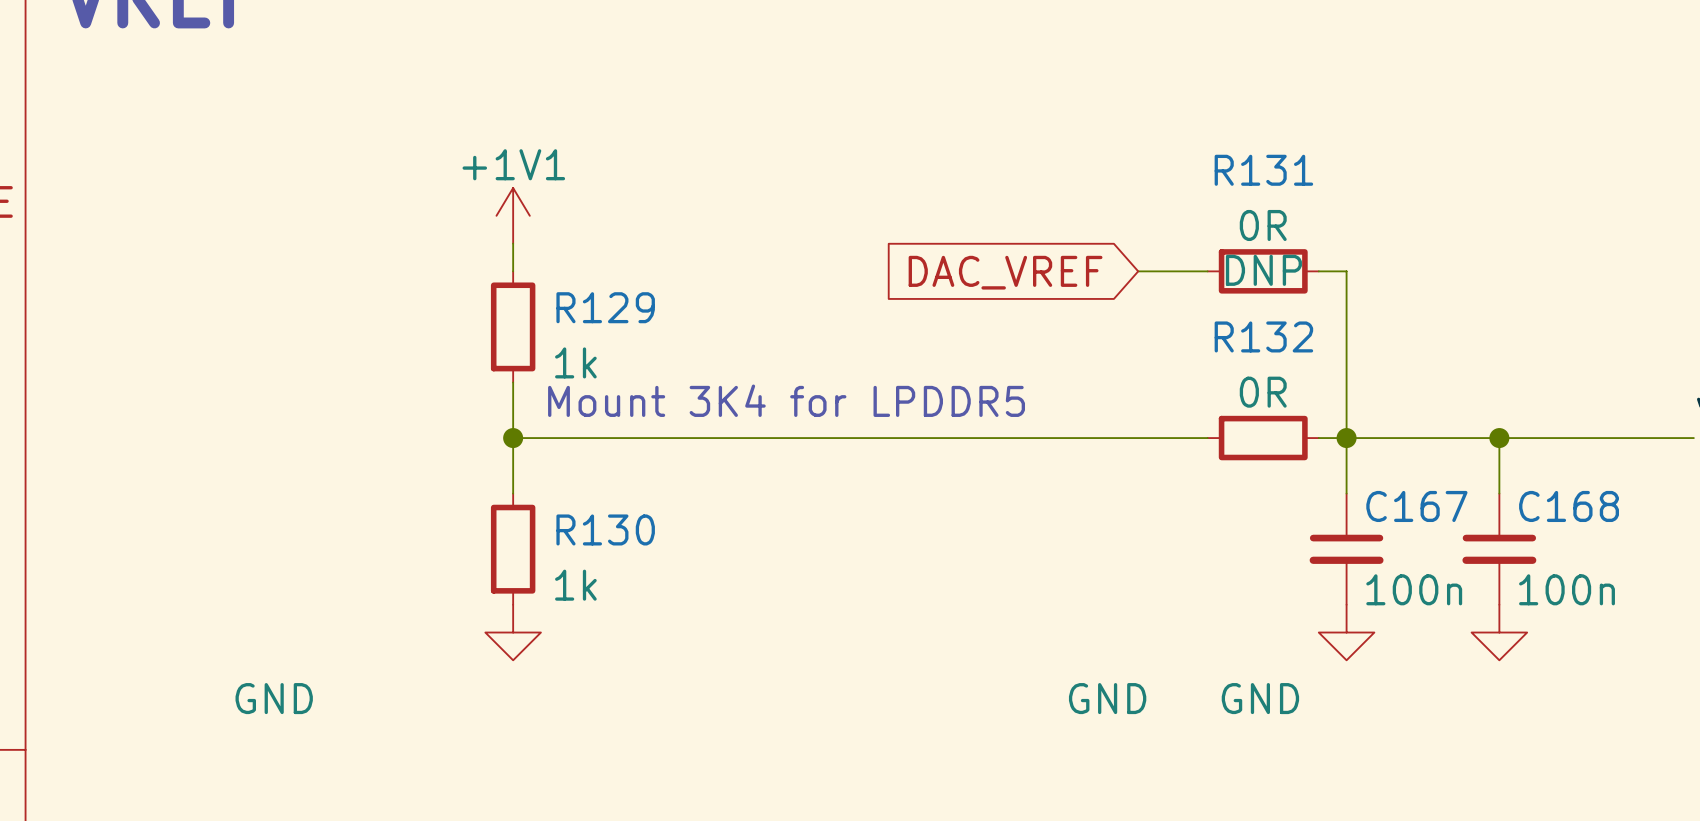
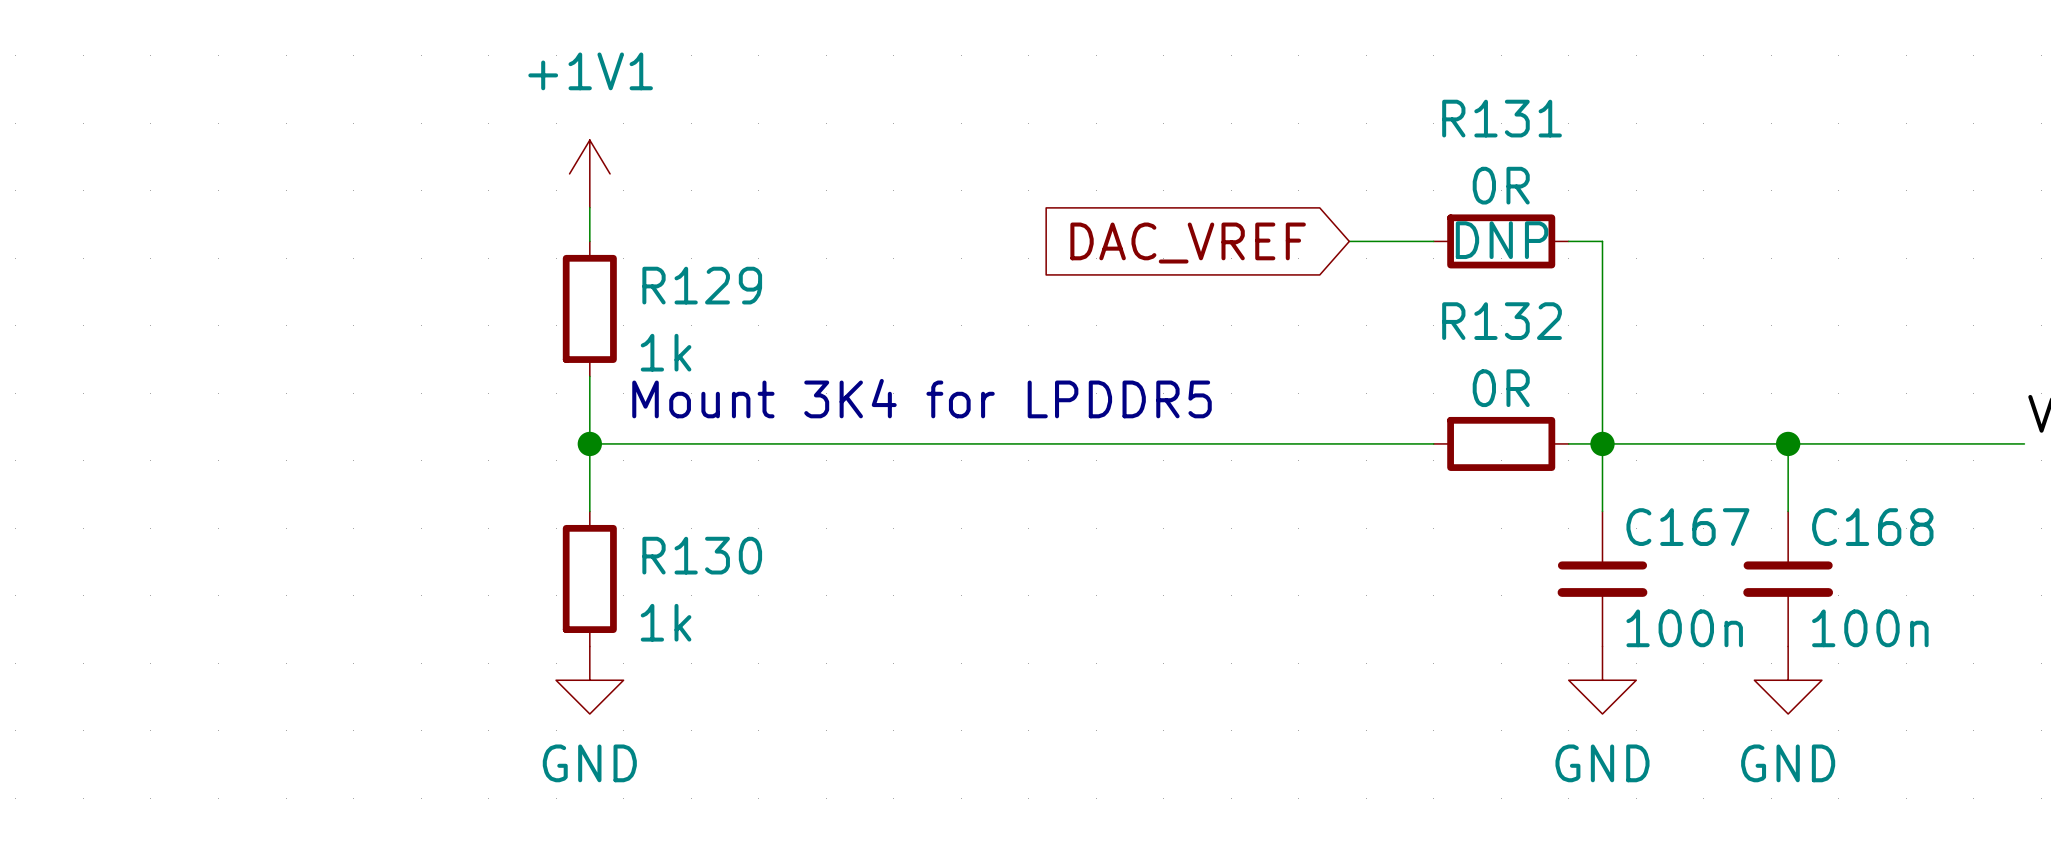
power symbol text position: +1V1 (513, 164) -> +1V1 (590, 71)
power symbol text position: GND (274, 698) -> GND (589, 763)
power symbol text position: GND (1107, 698) -> GND (1602, 763)
power symbol text position: GND (1260, 698) -> GND (1788, 763)

